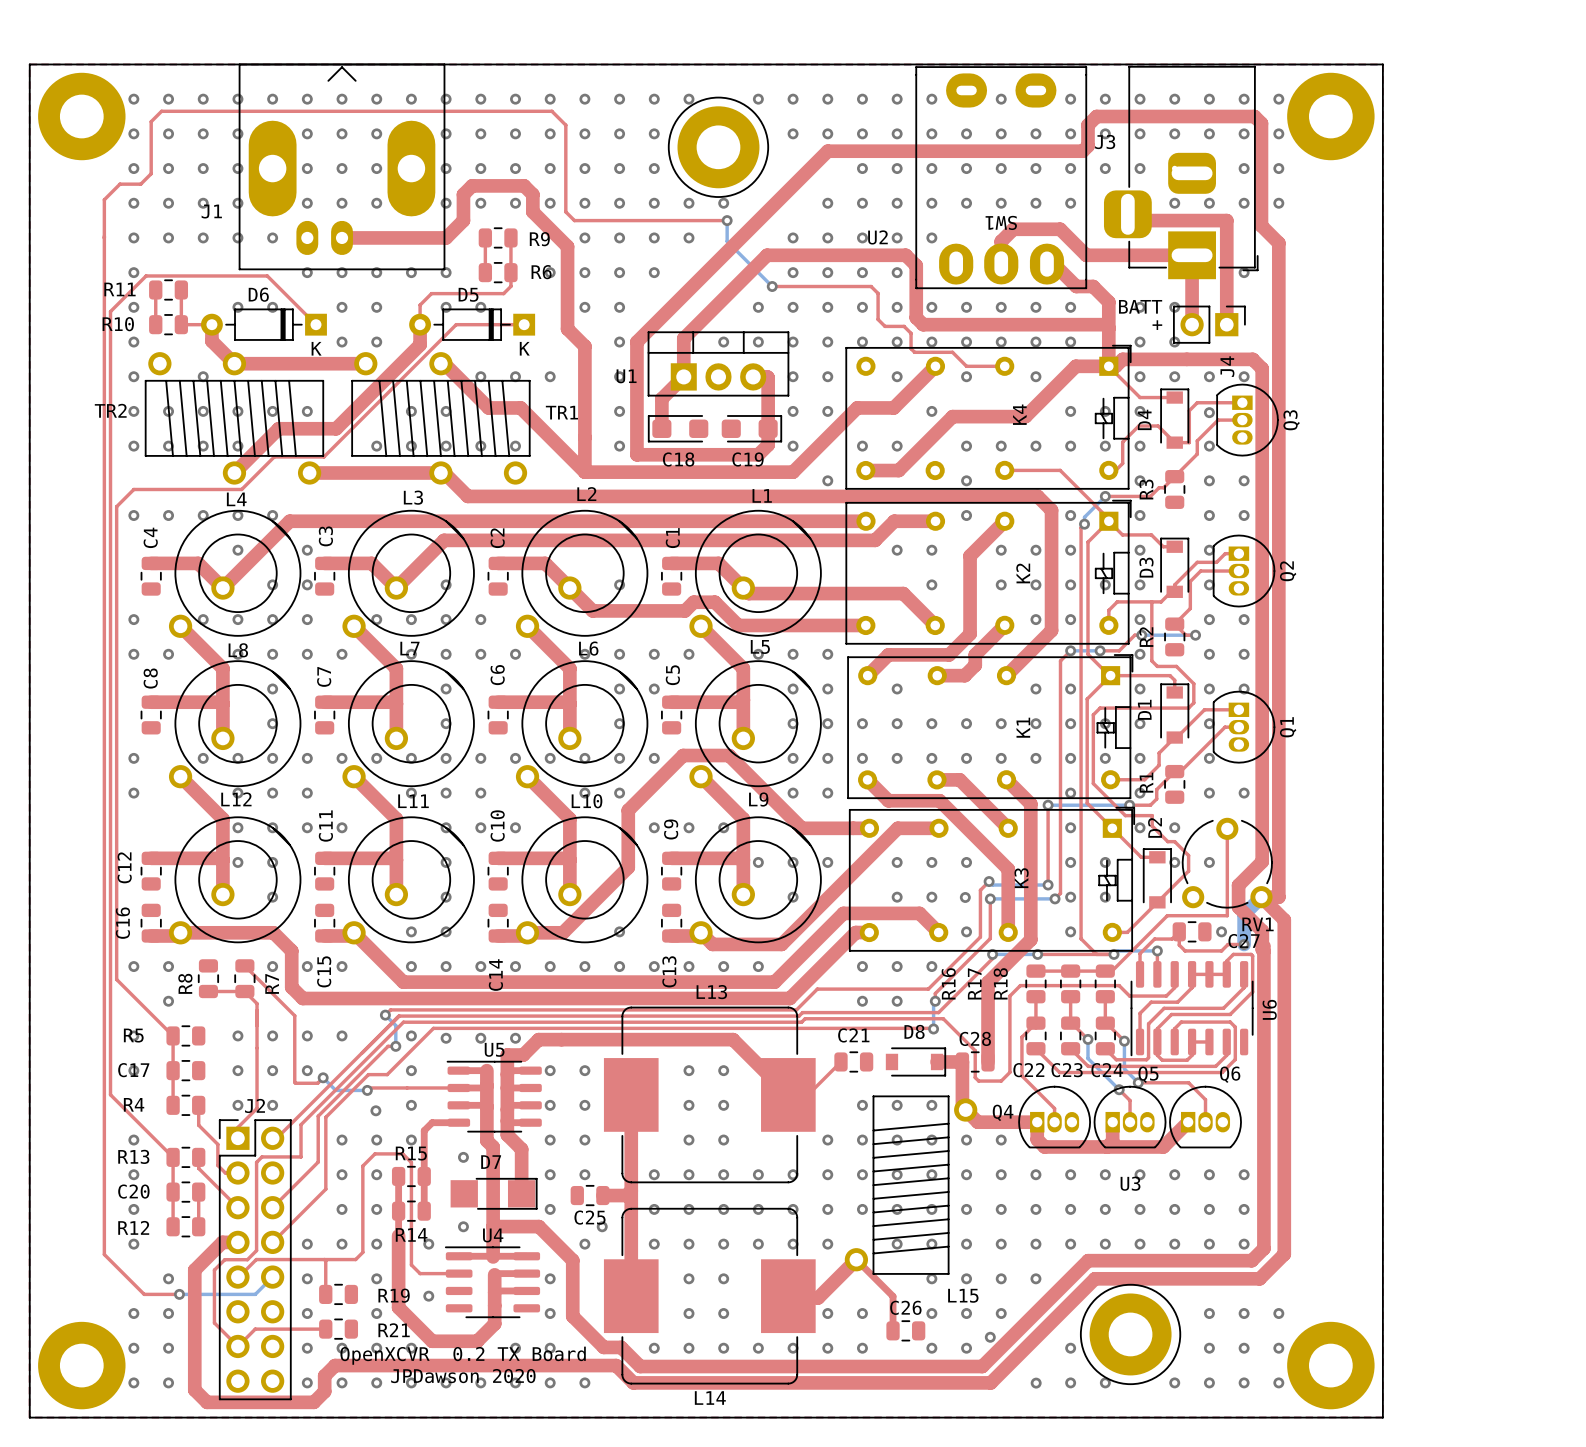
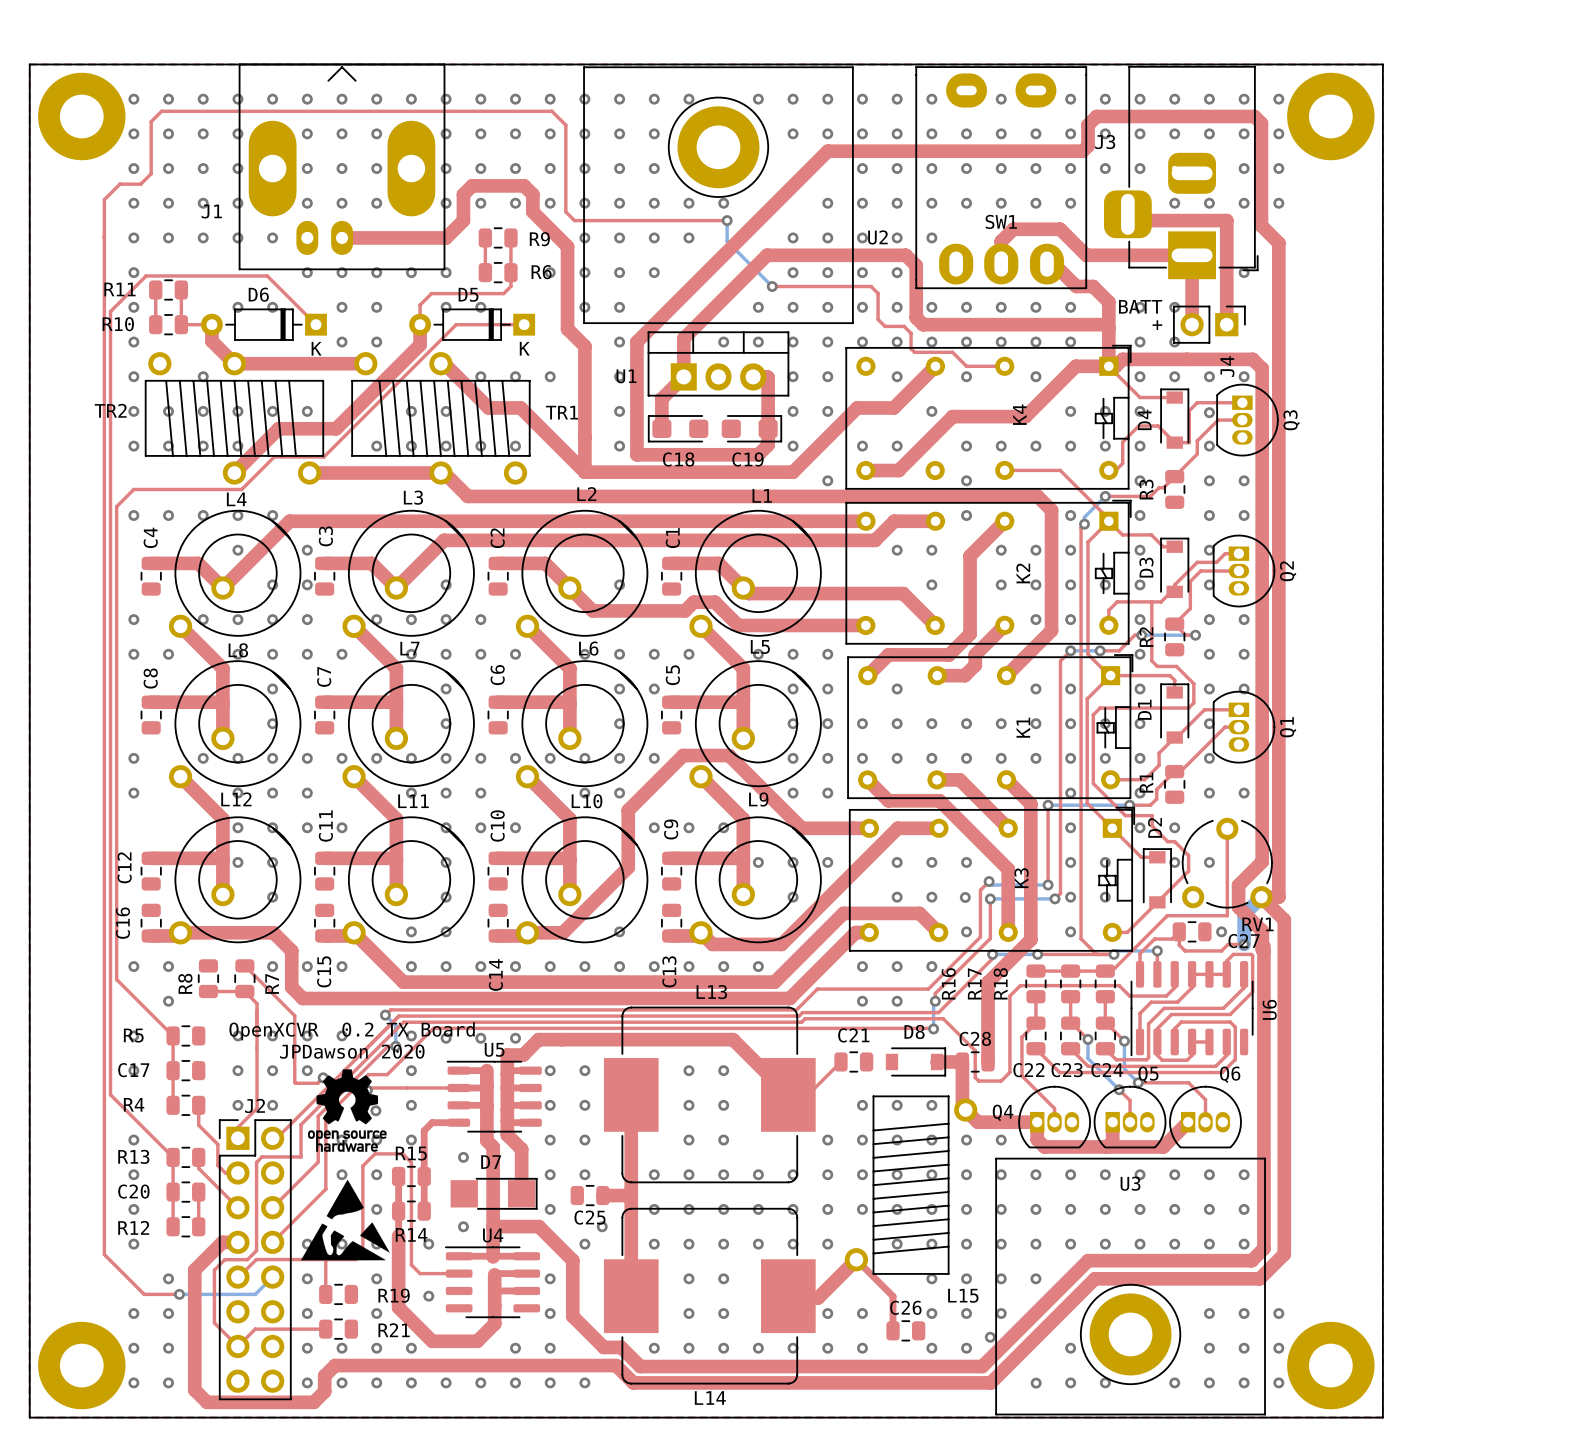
U2 footprint: [667, 96, 770, 198] -> [583, 66, 854, 324]
SW1 name rotation: 0° (1001, 222) -> 180° (1001, 221)
text: none -> OpenXCVR 0.2 TX Board (352, 1031)
text: none -> JPDawson 2020 (352, 1051)
drawing: none -> [308, 1069, 387, 1152]
drawing: none -> [301, 1179, 390, 1261]
U3 footprint: [1080, 1283, 1182, 1386] -> [995, 1157, 1266, 1416]
text: OpenXCVR 0.2 TX Board (463, 1355) -> none
text: JPDawson 2020 (463, 1376) -> none

